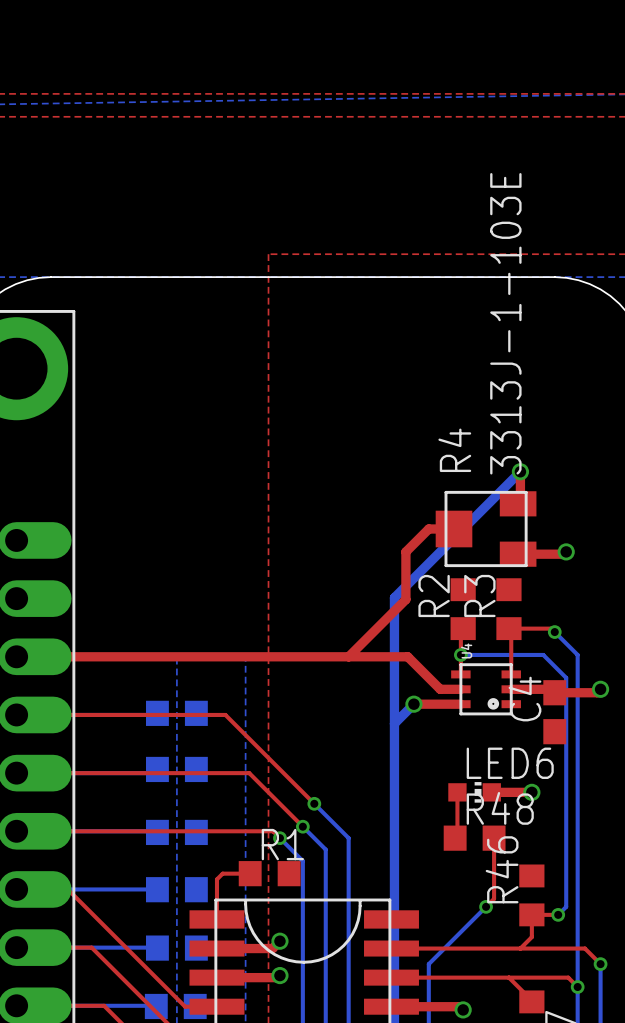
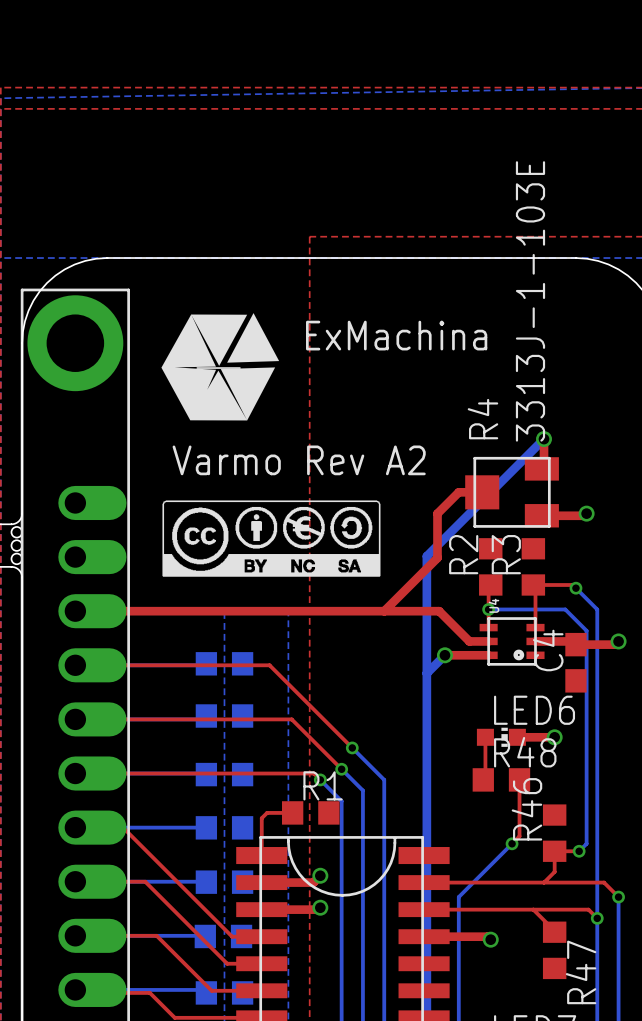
drawing: none -> [161, 313, 280, 421]
text: none -> Varmo Rev A2 (299, 460)
drawing: none -> [162, 500, 381, 577]

